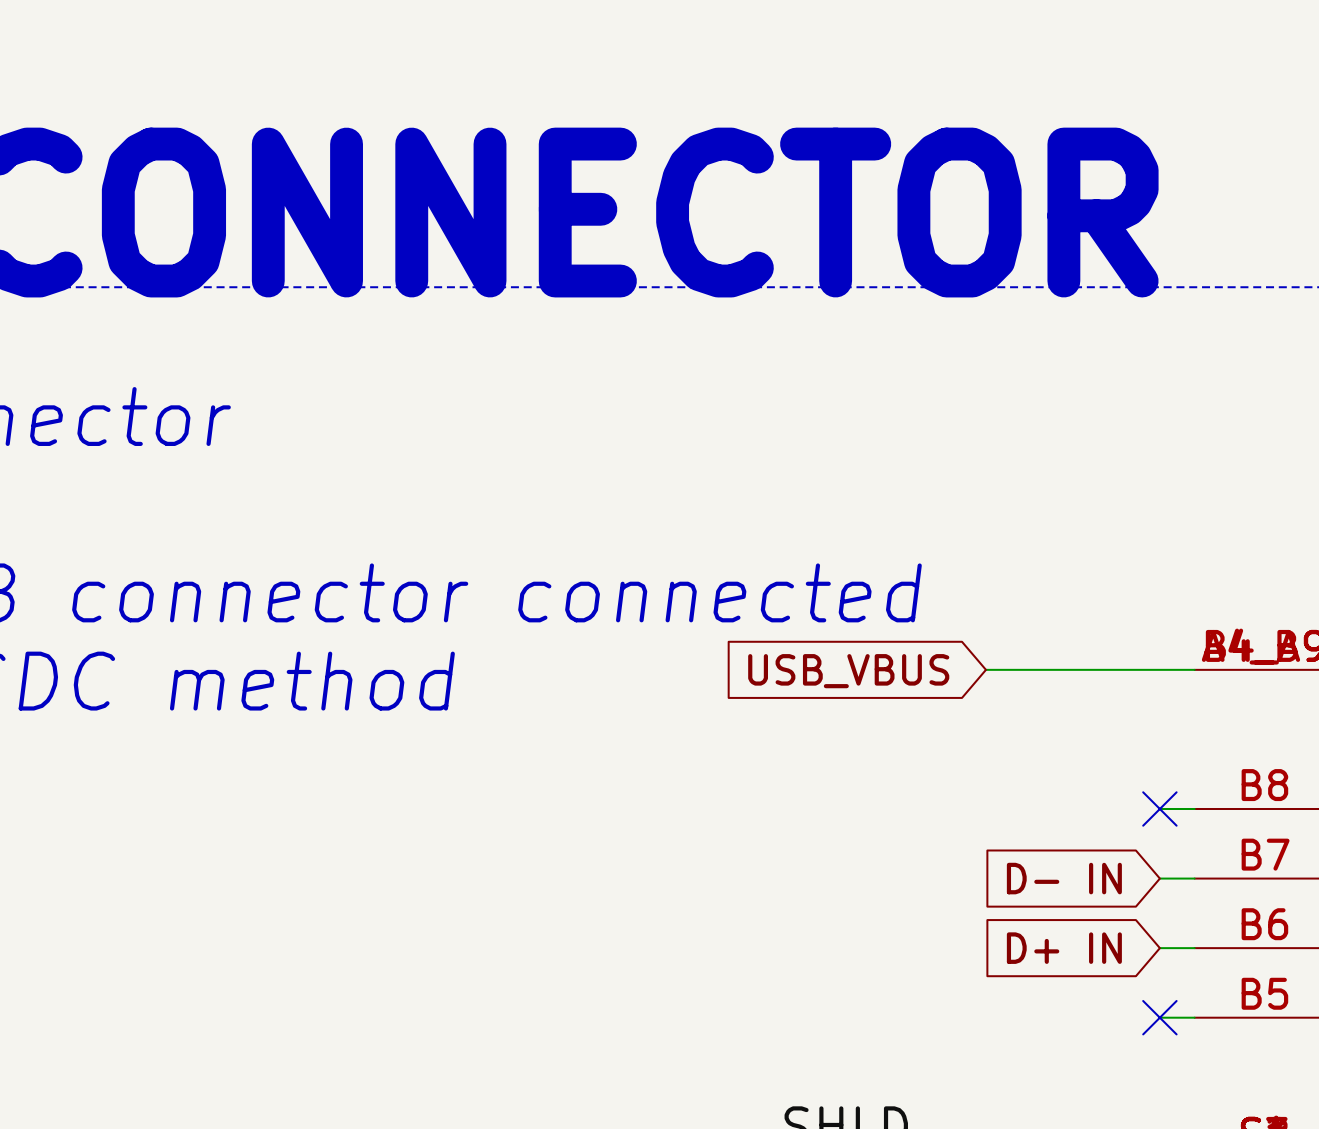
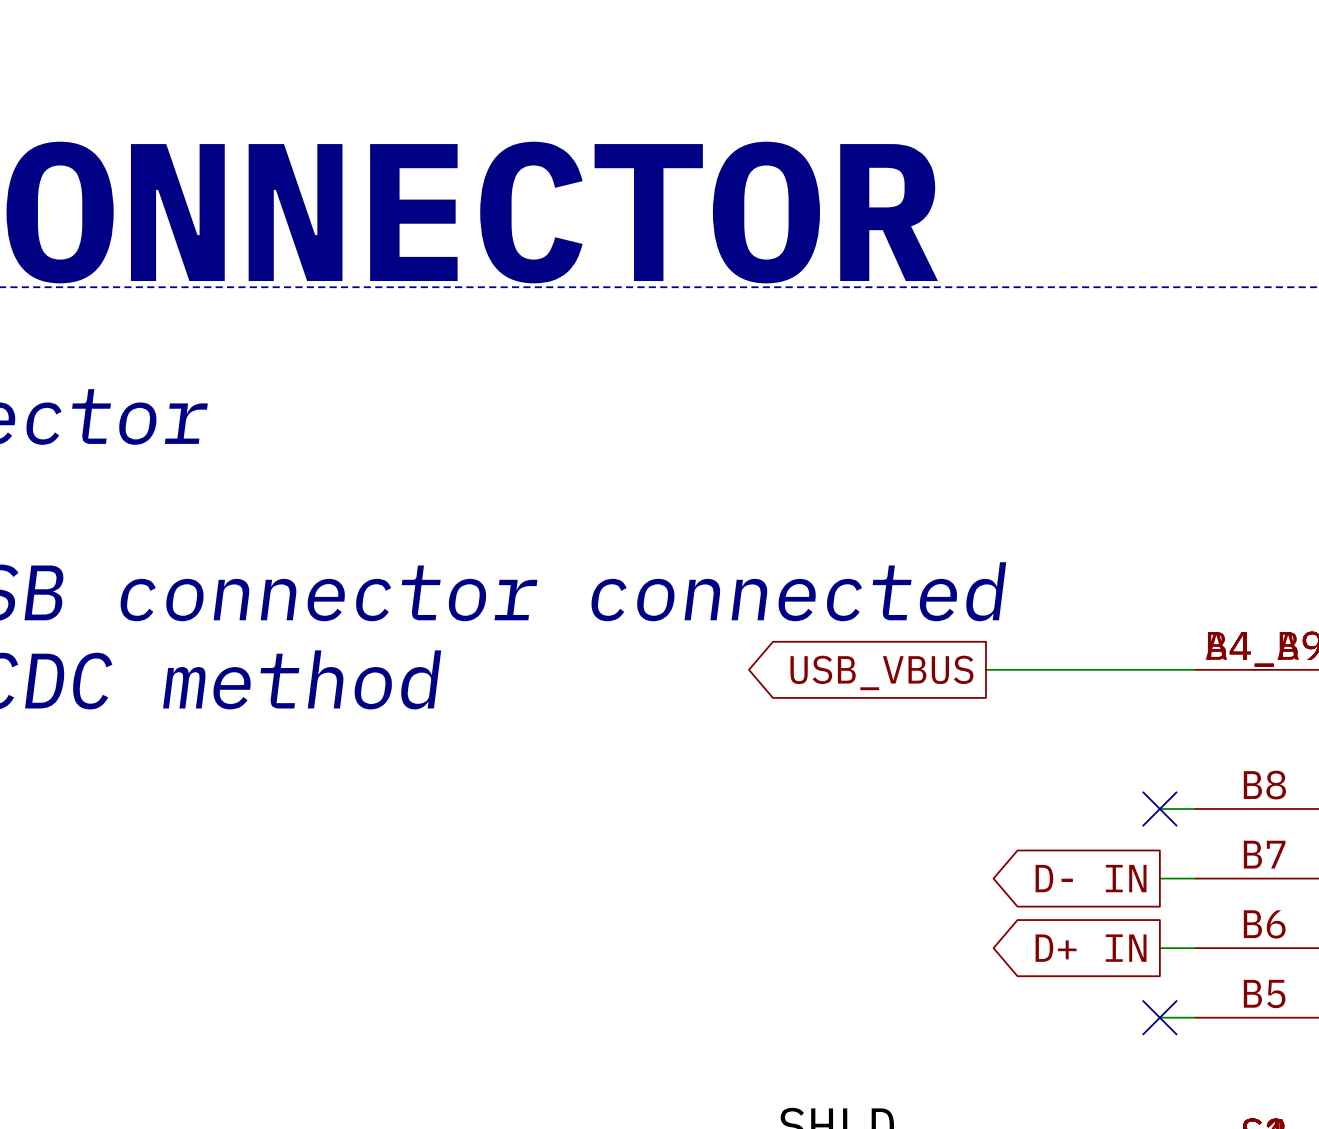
global label shape: input (848, 671) -> output (881, 672)
global label shape: input (1064, 878) -> output (1091, 878)
global label shape: input (1064, 948) -> output (1091, 948)

